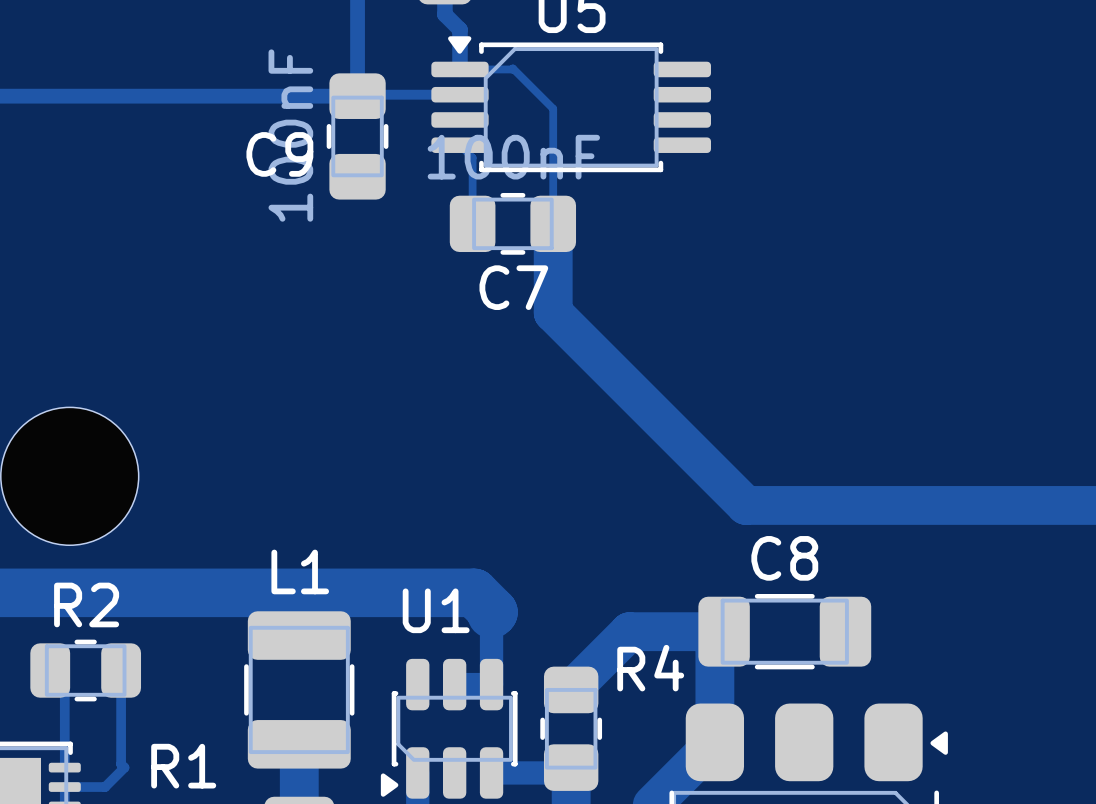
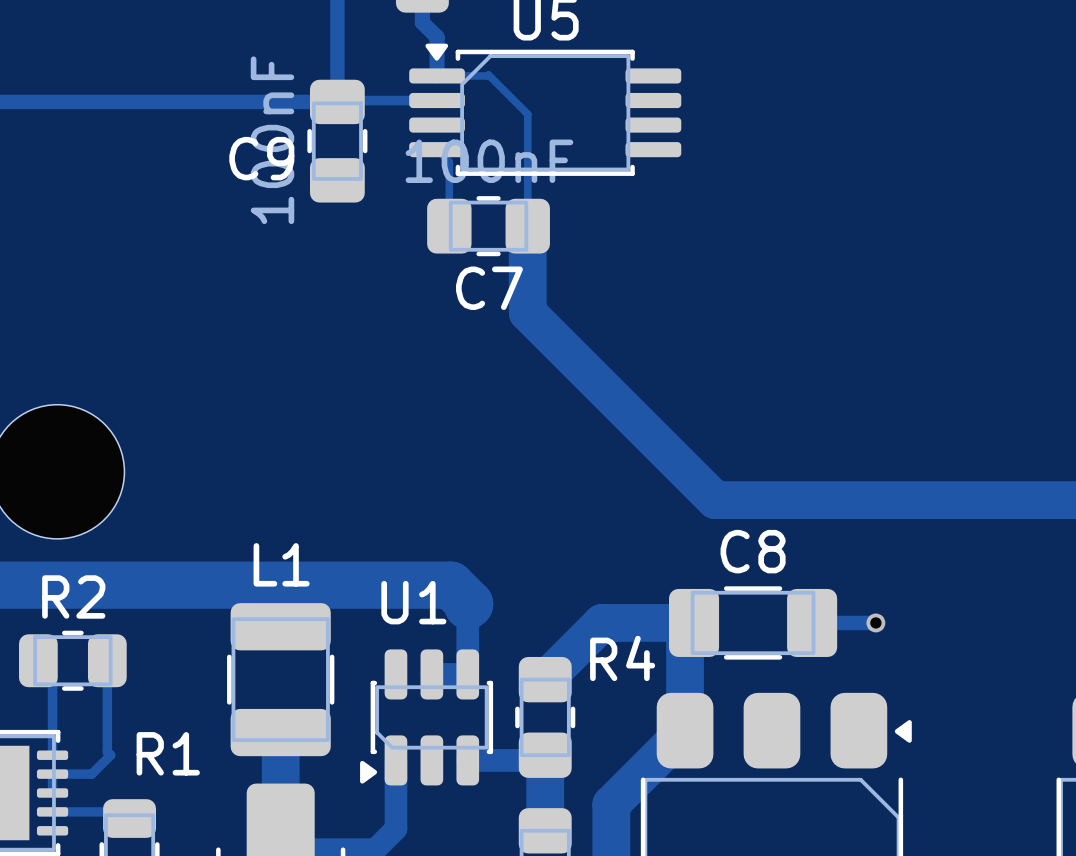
track: none -> (812, 622) (875, 622)
via: none -> (875, 622)

